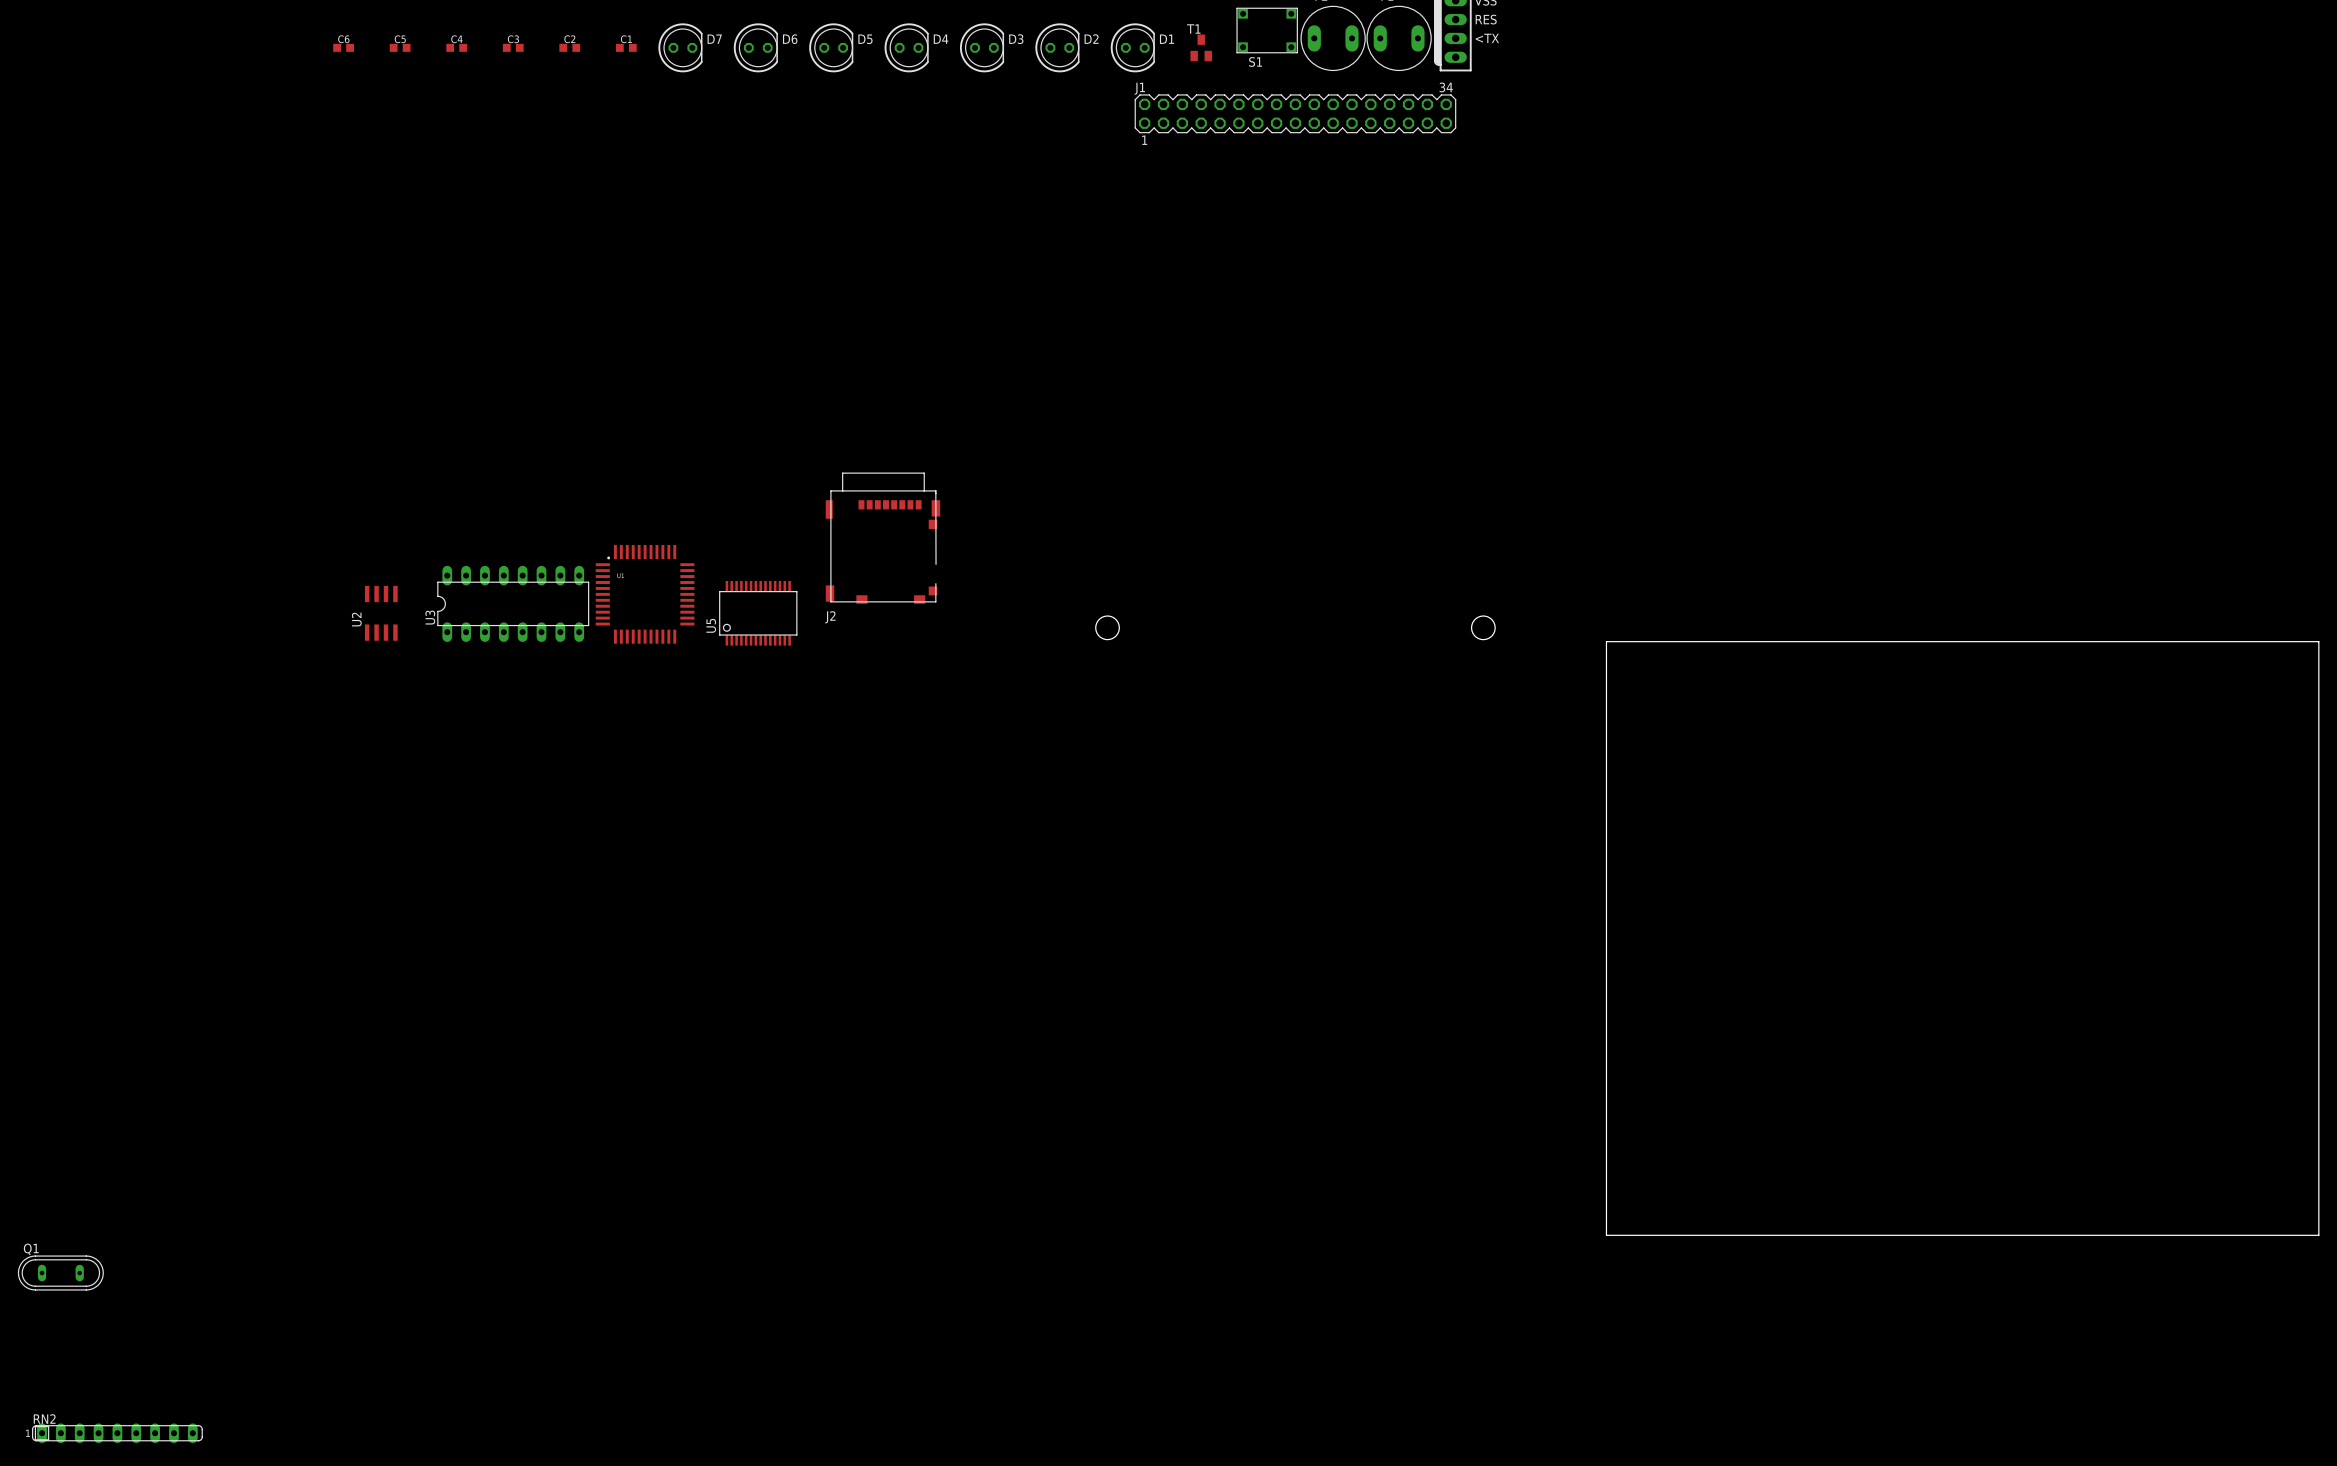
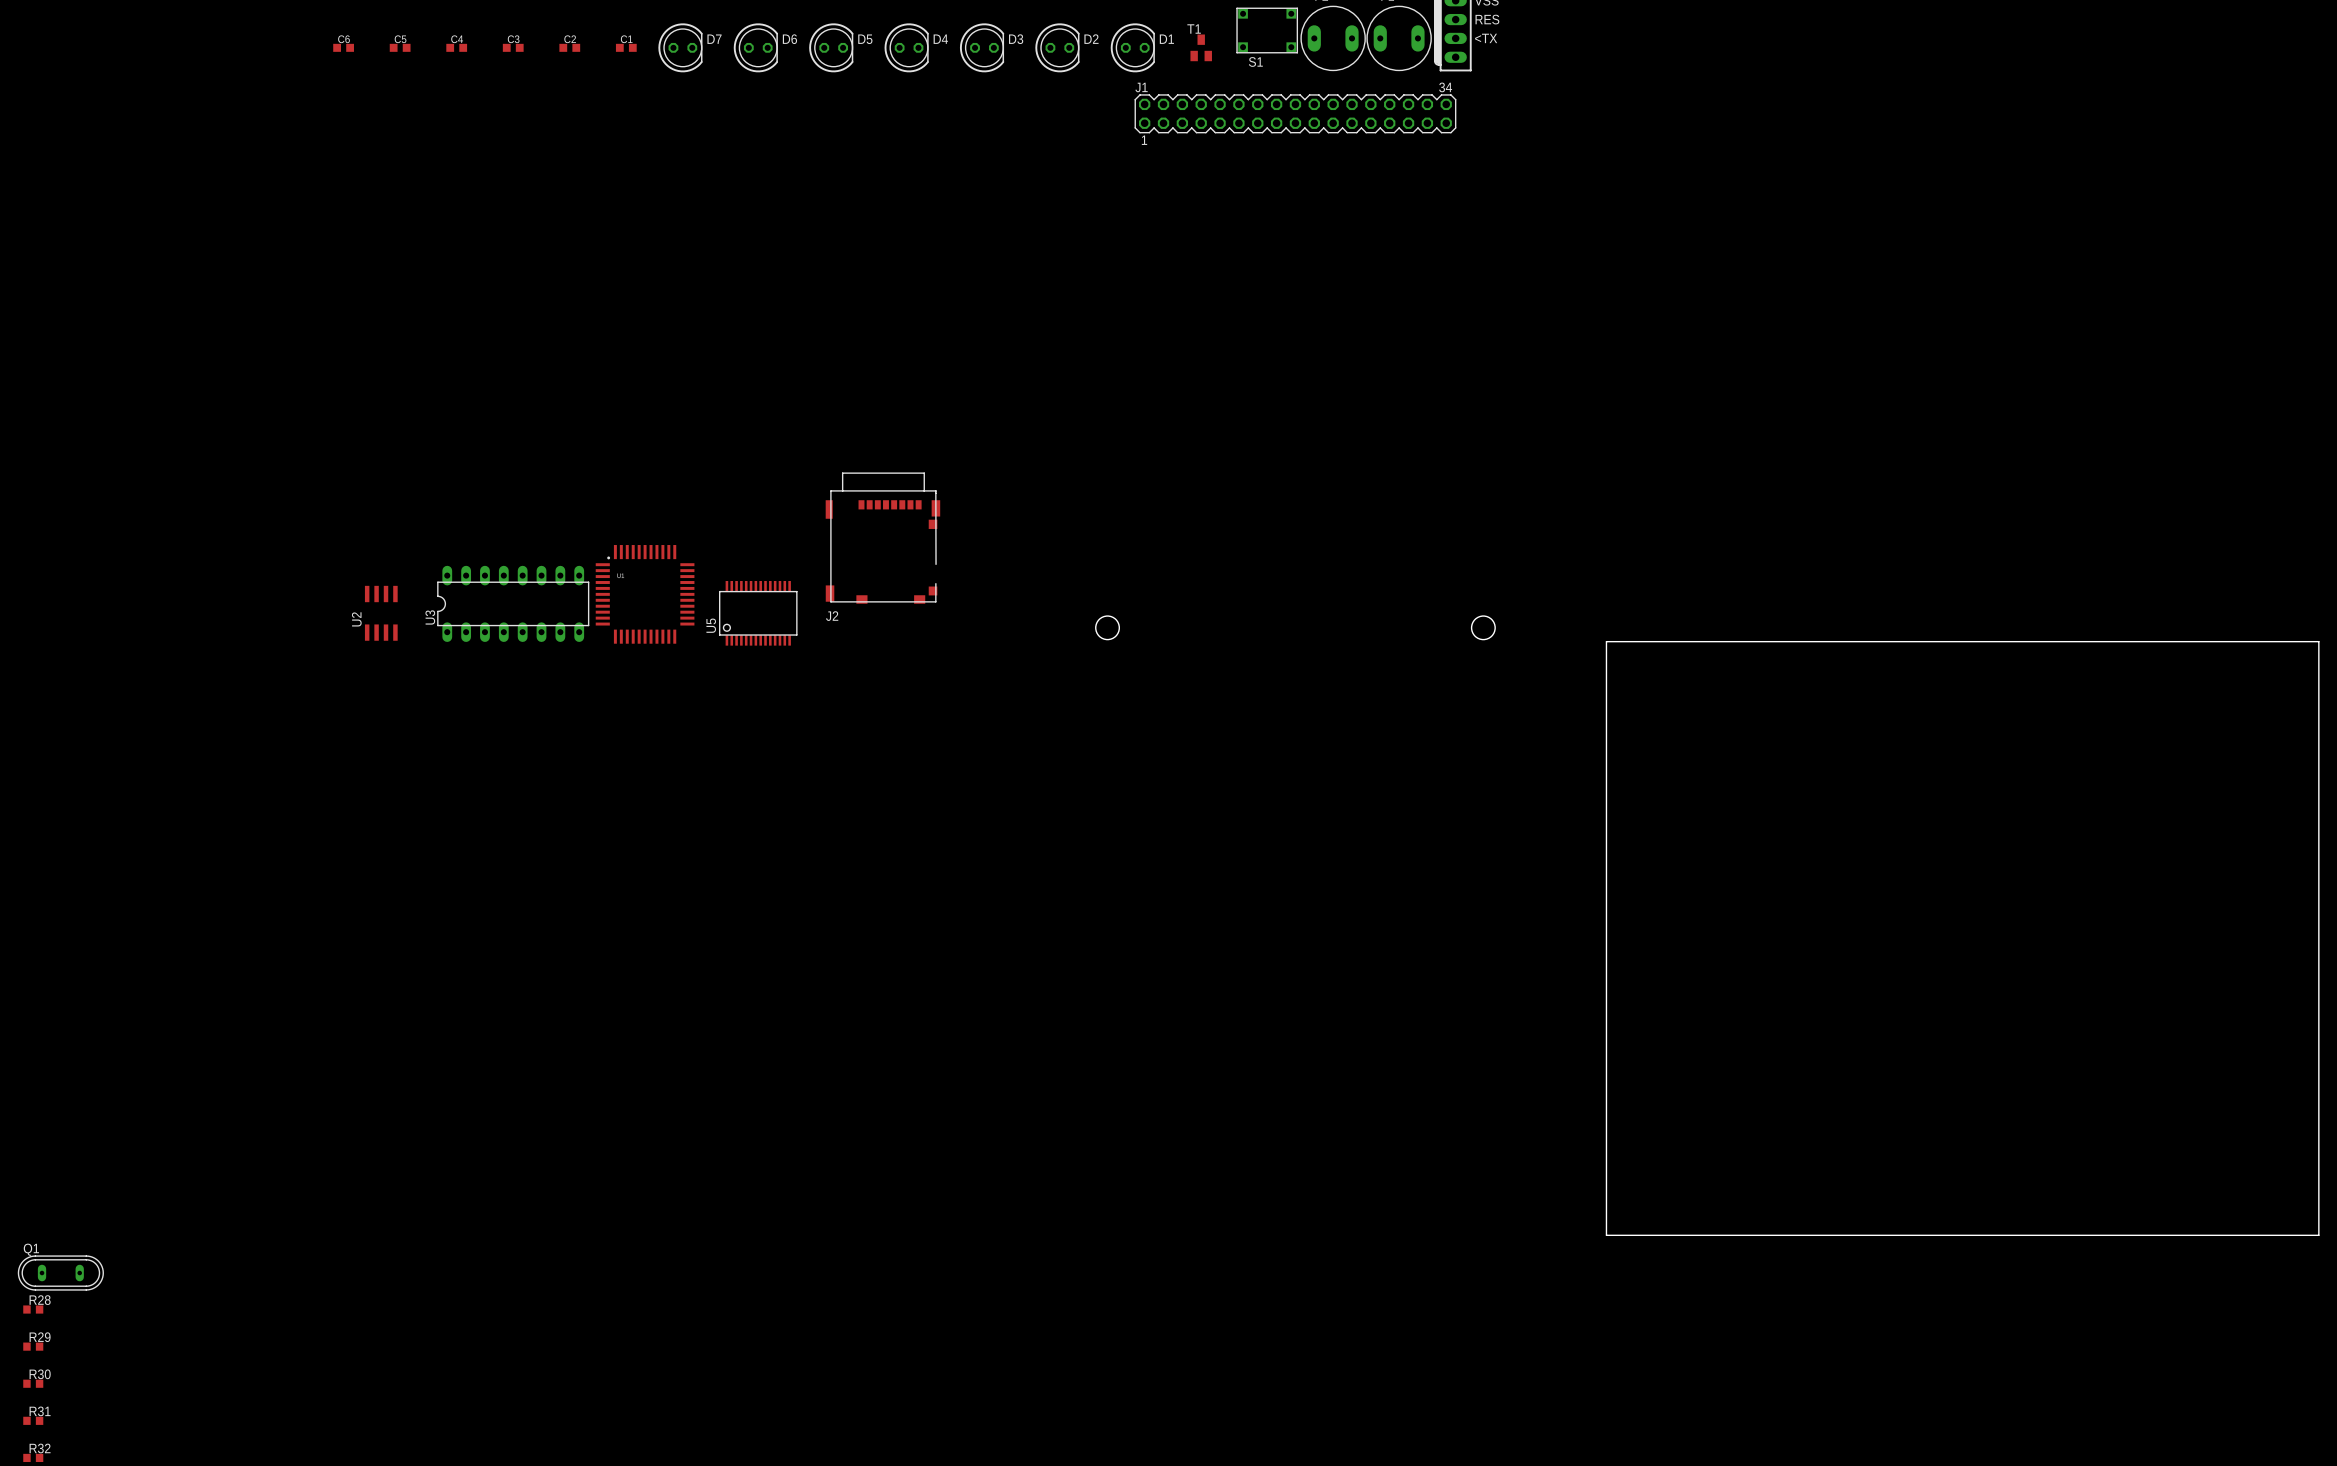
R28: none -> (33, 1309)
R29: none -> (33, 1346)
R30: none -> (33, 1383)
R31: none -> (33, 1420)
RN2: (117, 1433) -> none
R32: none -> (33, 1457)

